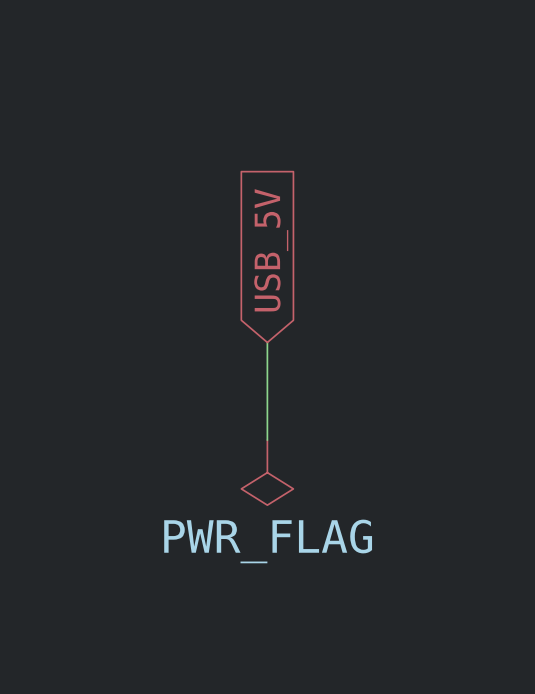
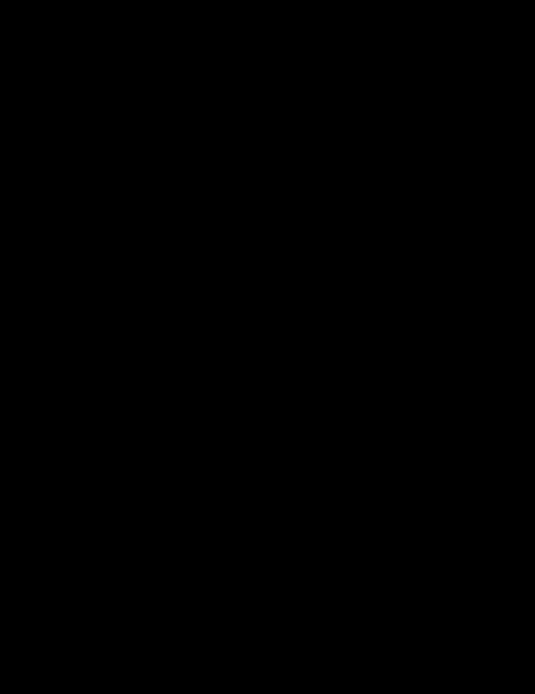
global label: USB_5V (271, 250) -> none
wire: (267, 342) (267, 440) -> none
power symbol: PWR_FLAG (267, 472) -> none

